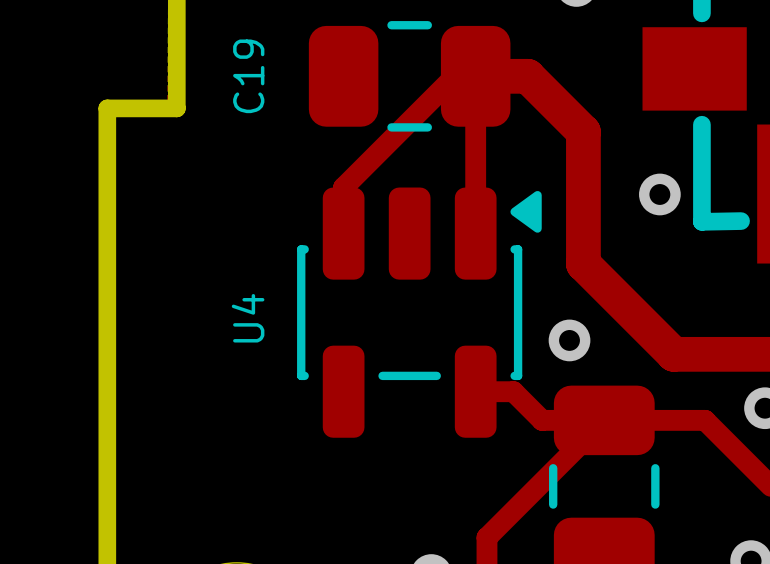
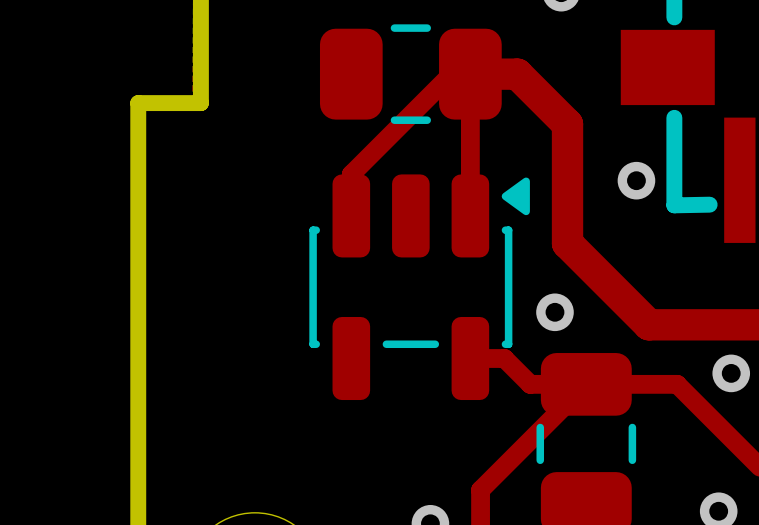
C19 name: C19 (248, 76) -> none
U4 name: U4 (248, 318) -> none

